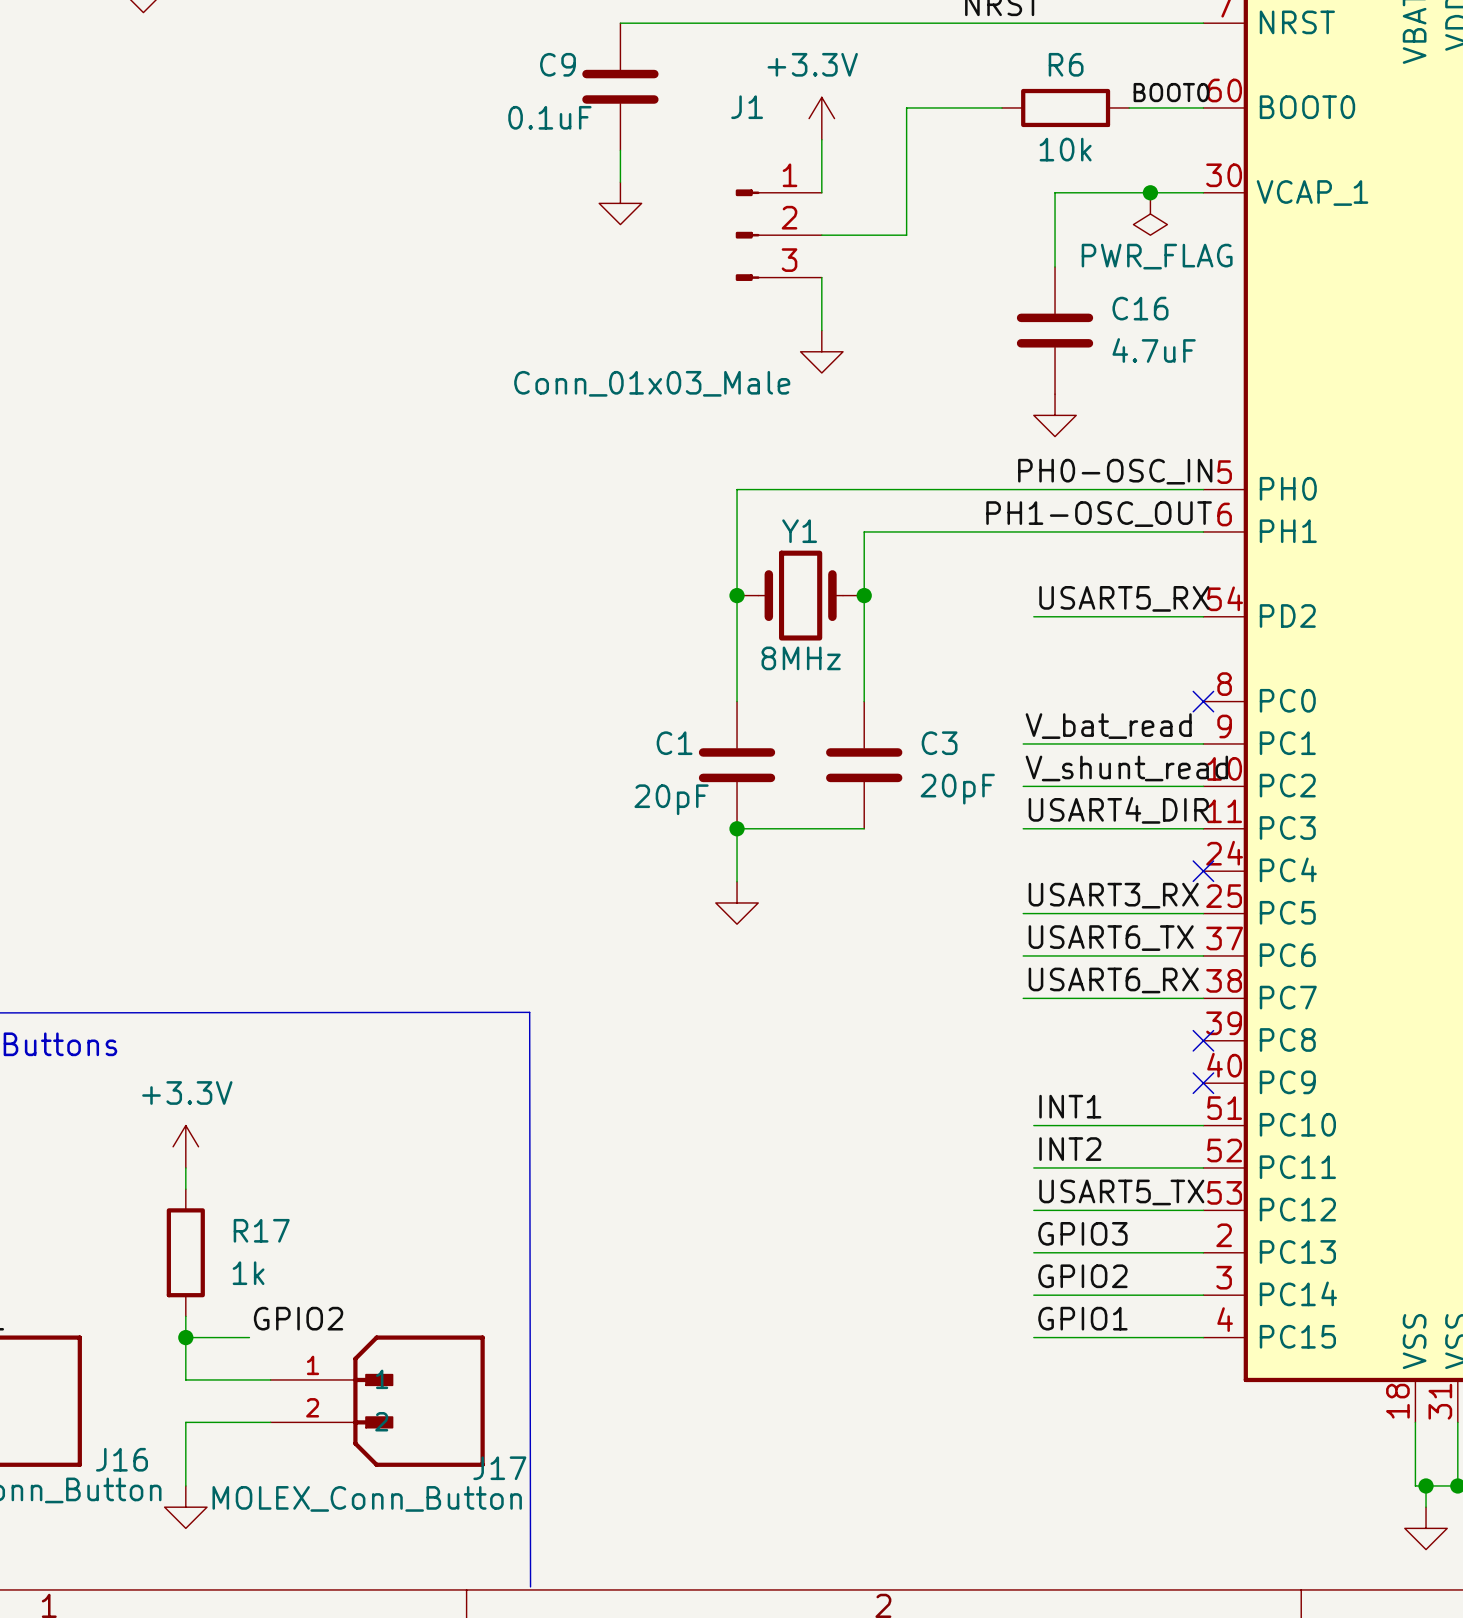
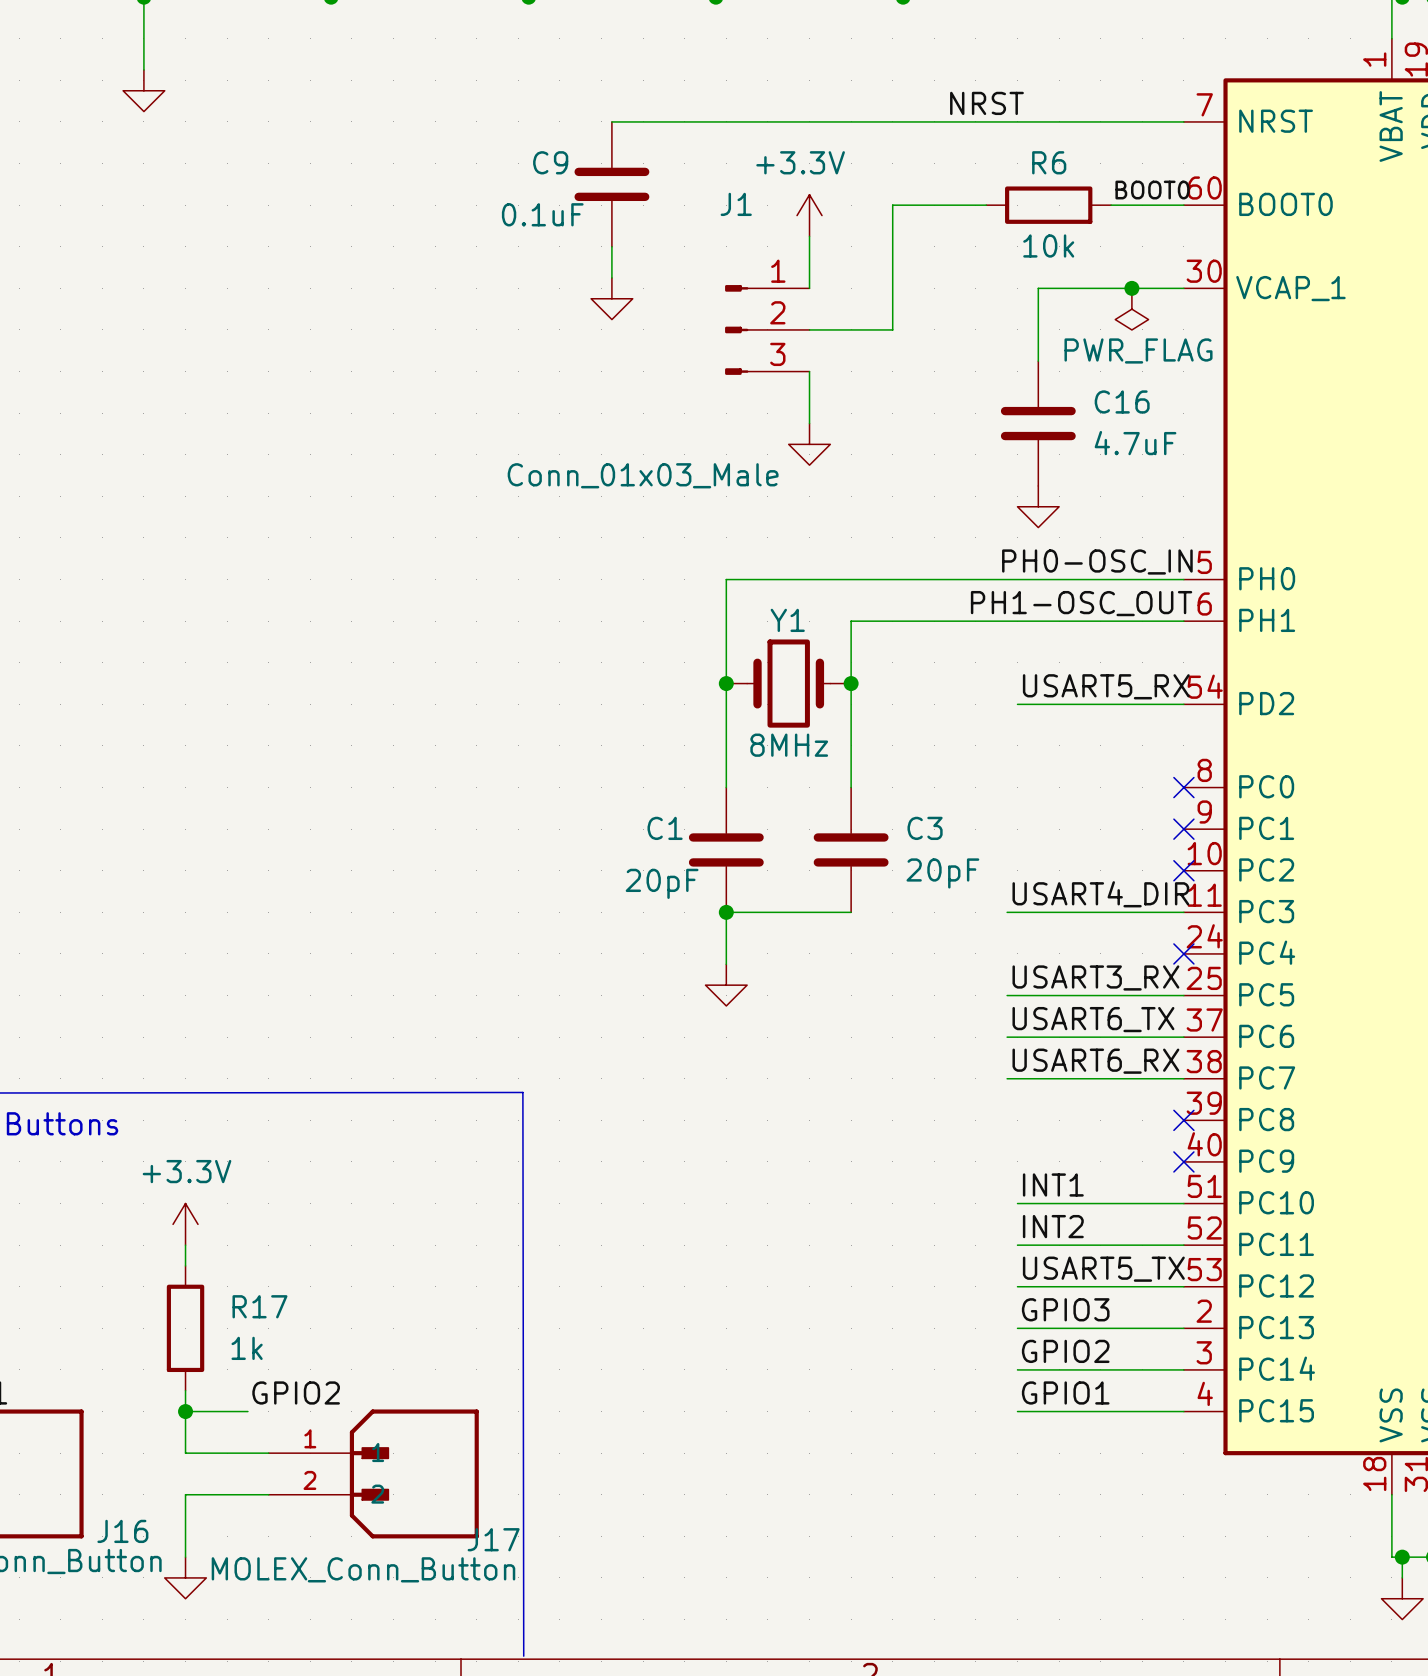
label: V_bat_read (1108, 726) -> none
wire: (1023, 743) (1203, 743) -> none
no-connect mark: none -> (1183, 829)
label: V_shunt_read (1126, 768) -> none
wire: (1023, 786) (1203, 786) -> none
no-connect mark: none -> (1183, 870)

